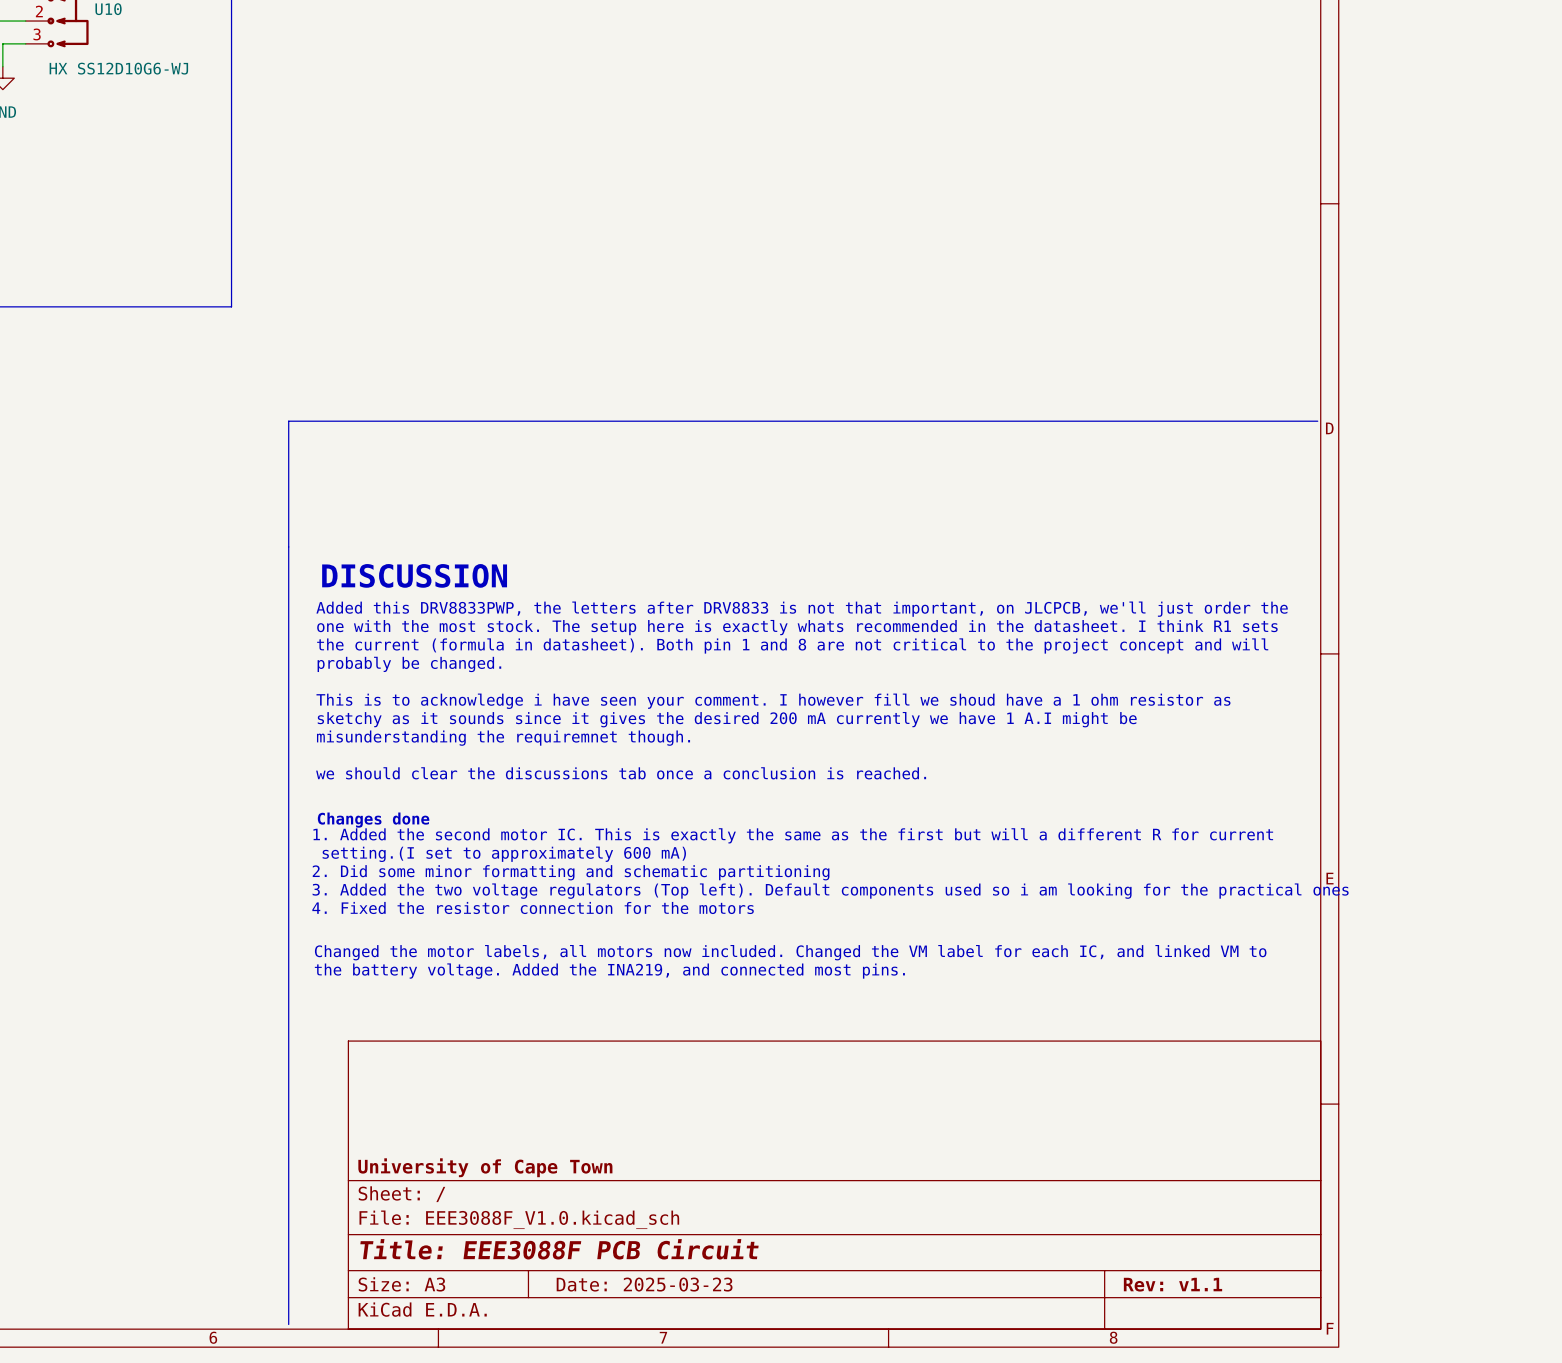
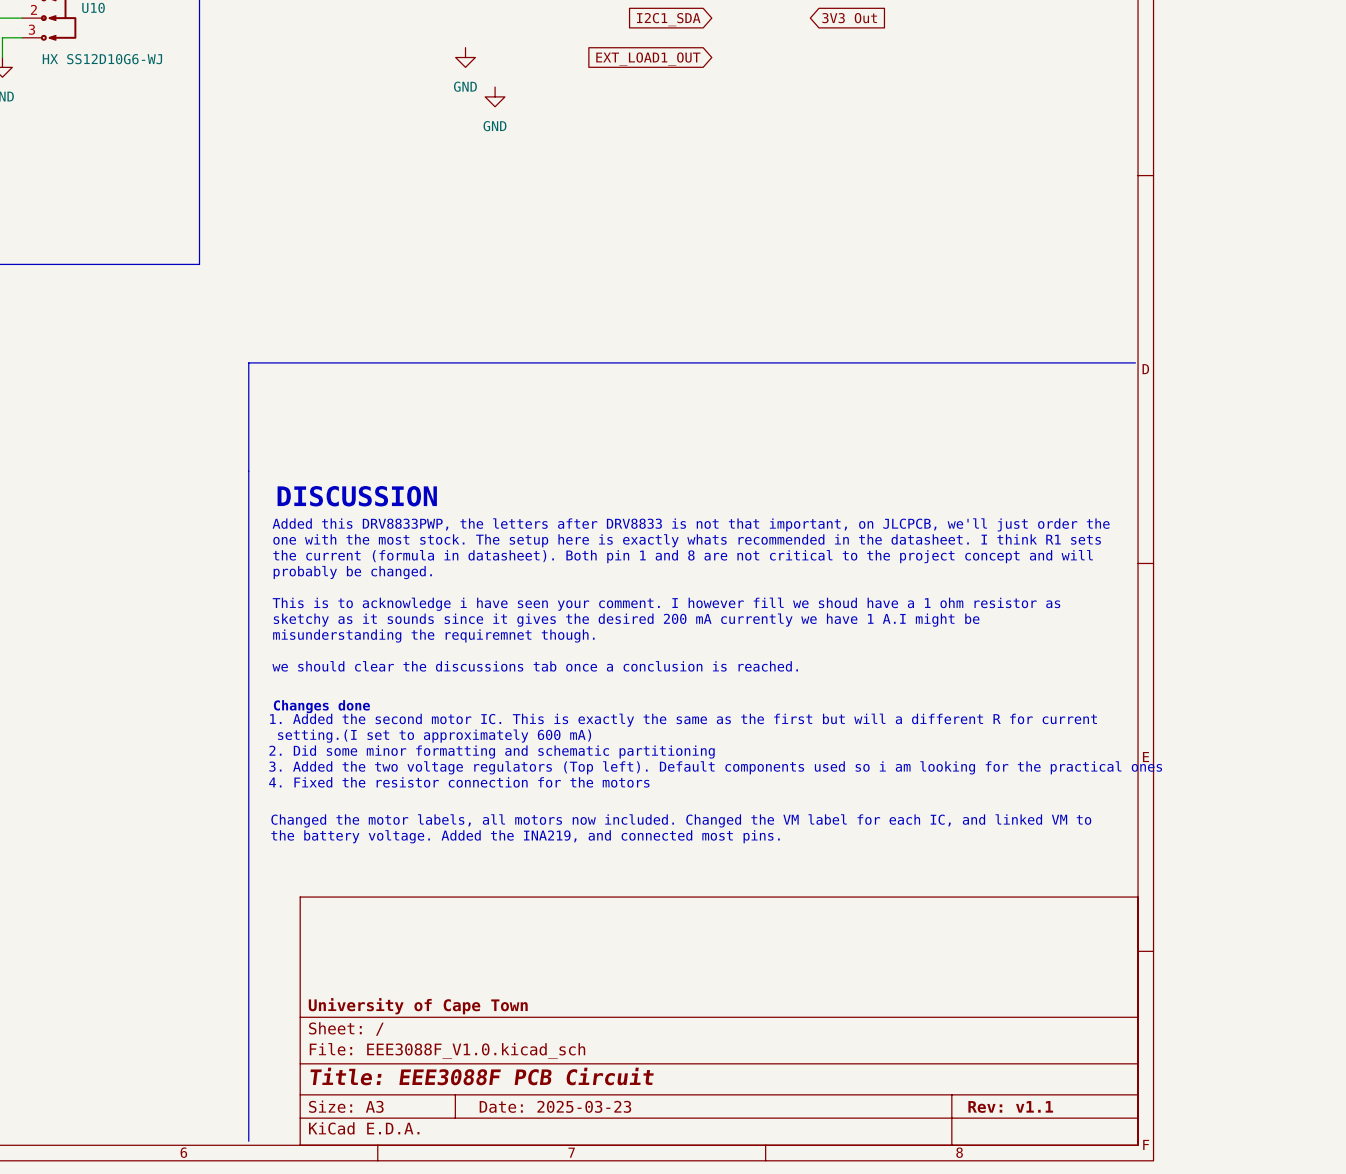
global label: none -> 3V3 Out (849, 18)
global label: none -> I2C1_SDA (668, 19)
power symbol: none -> GND (465, 57)
global label: none -> EXT_LOAD1_OUT (648, 59)
power symbol: none -> GND (495, 96)

